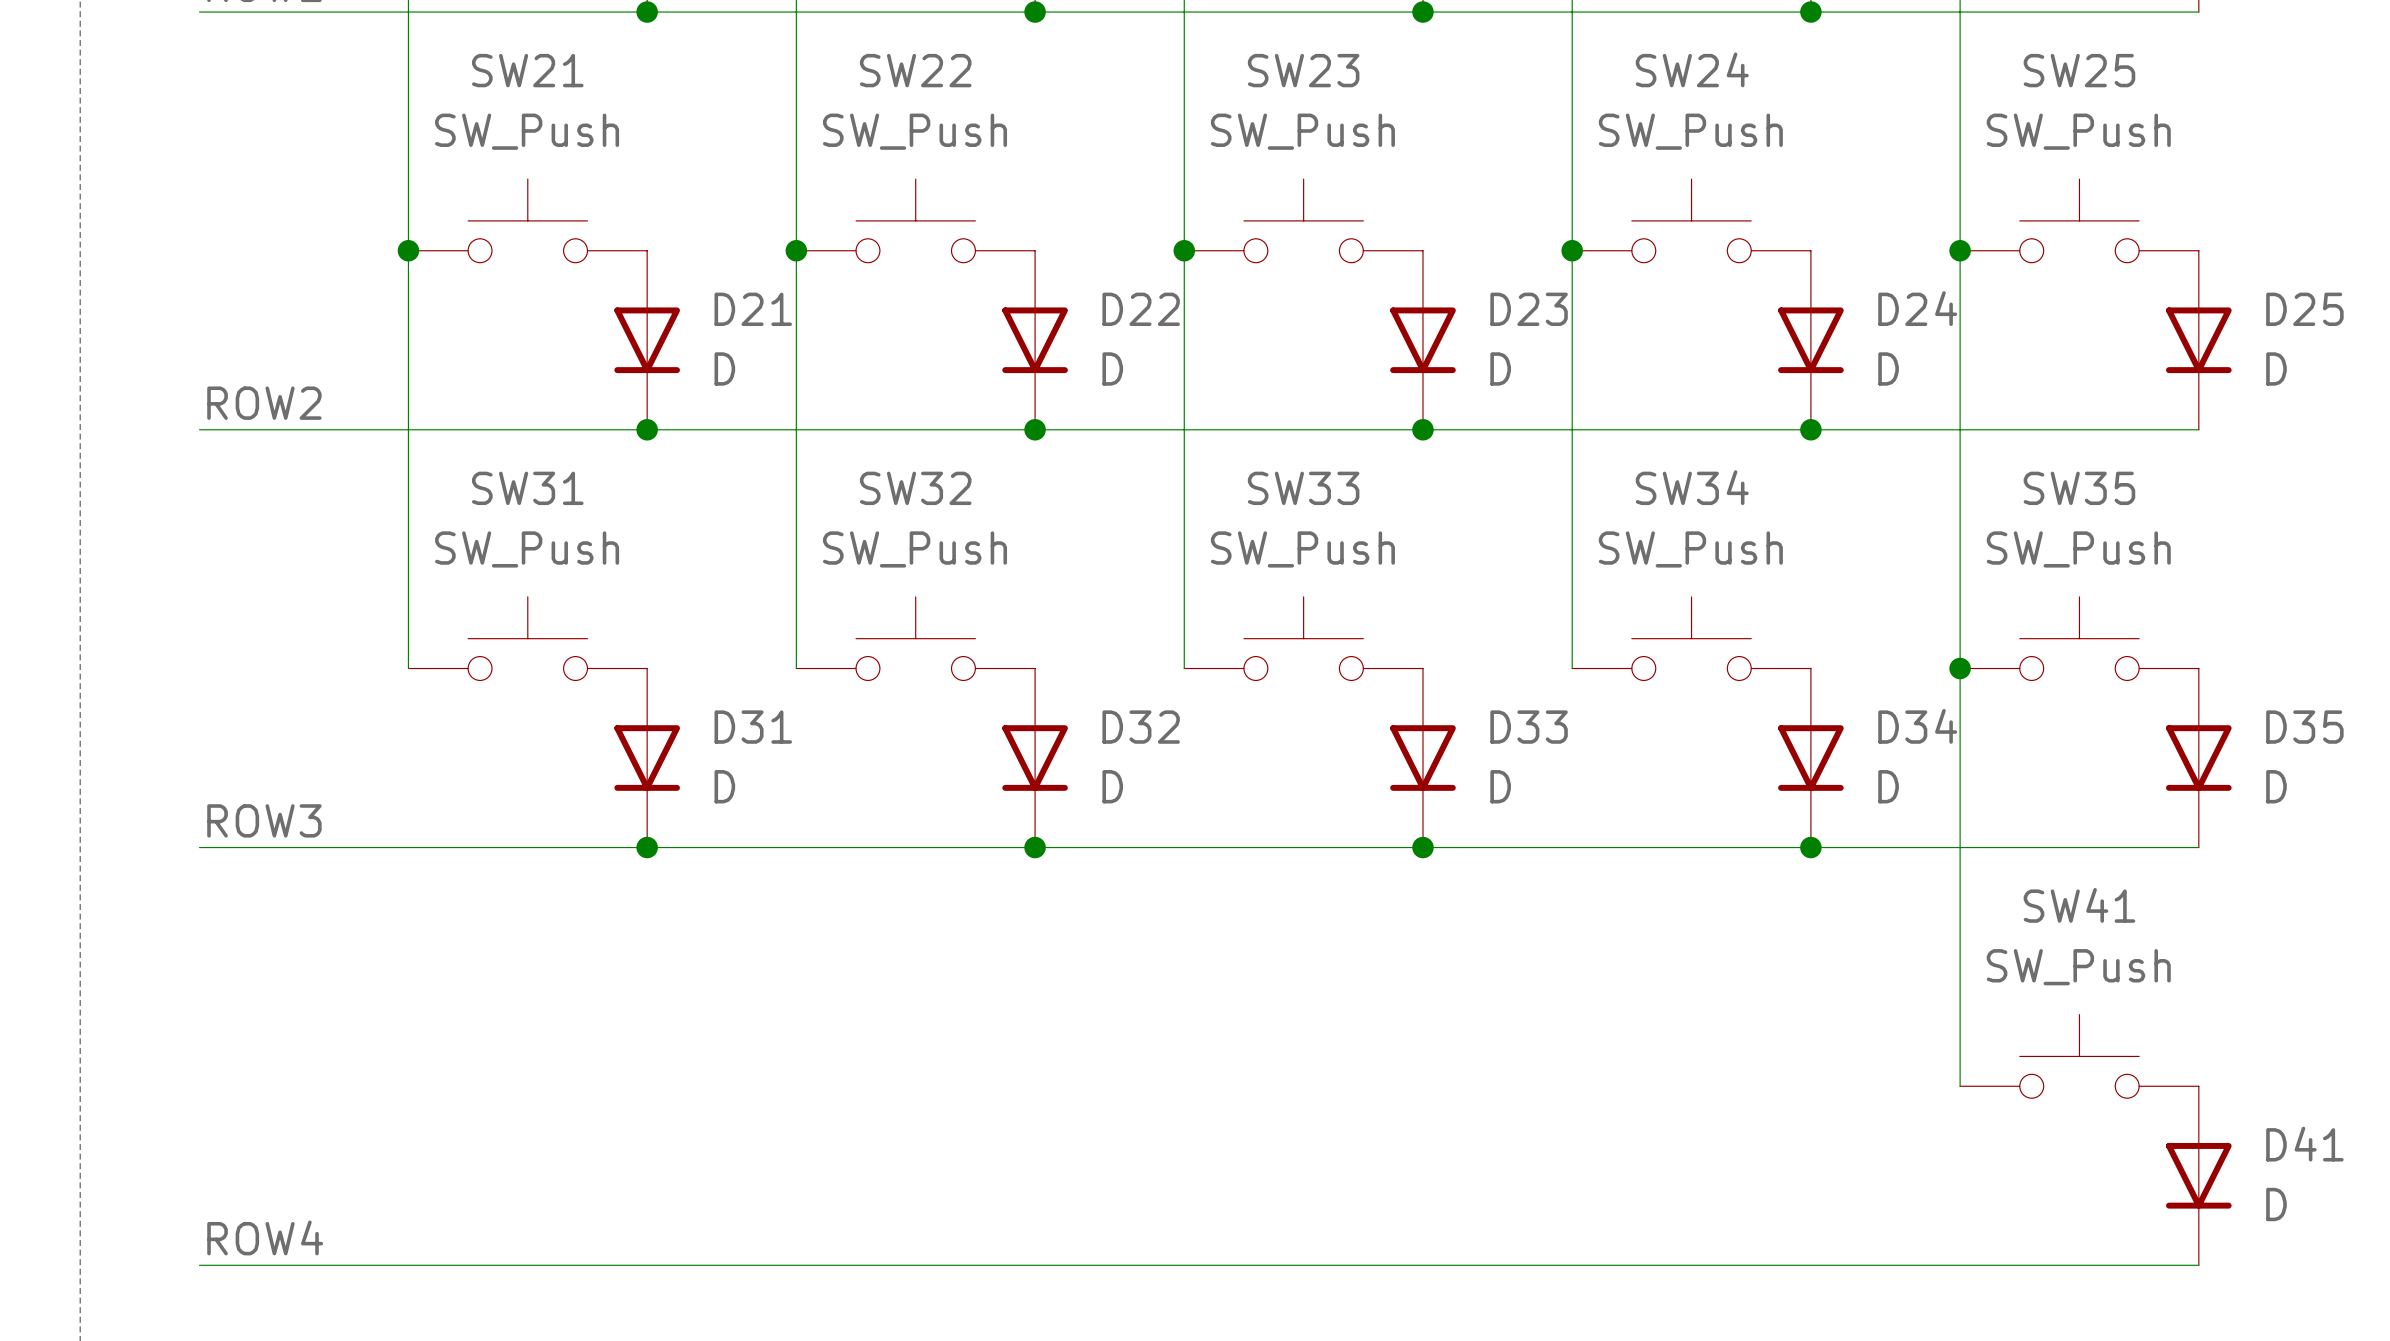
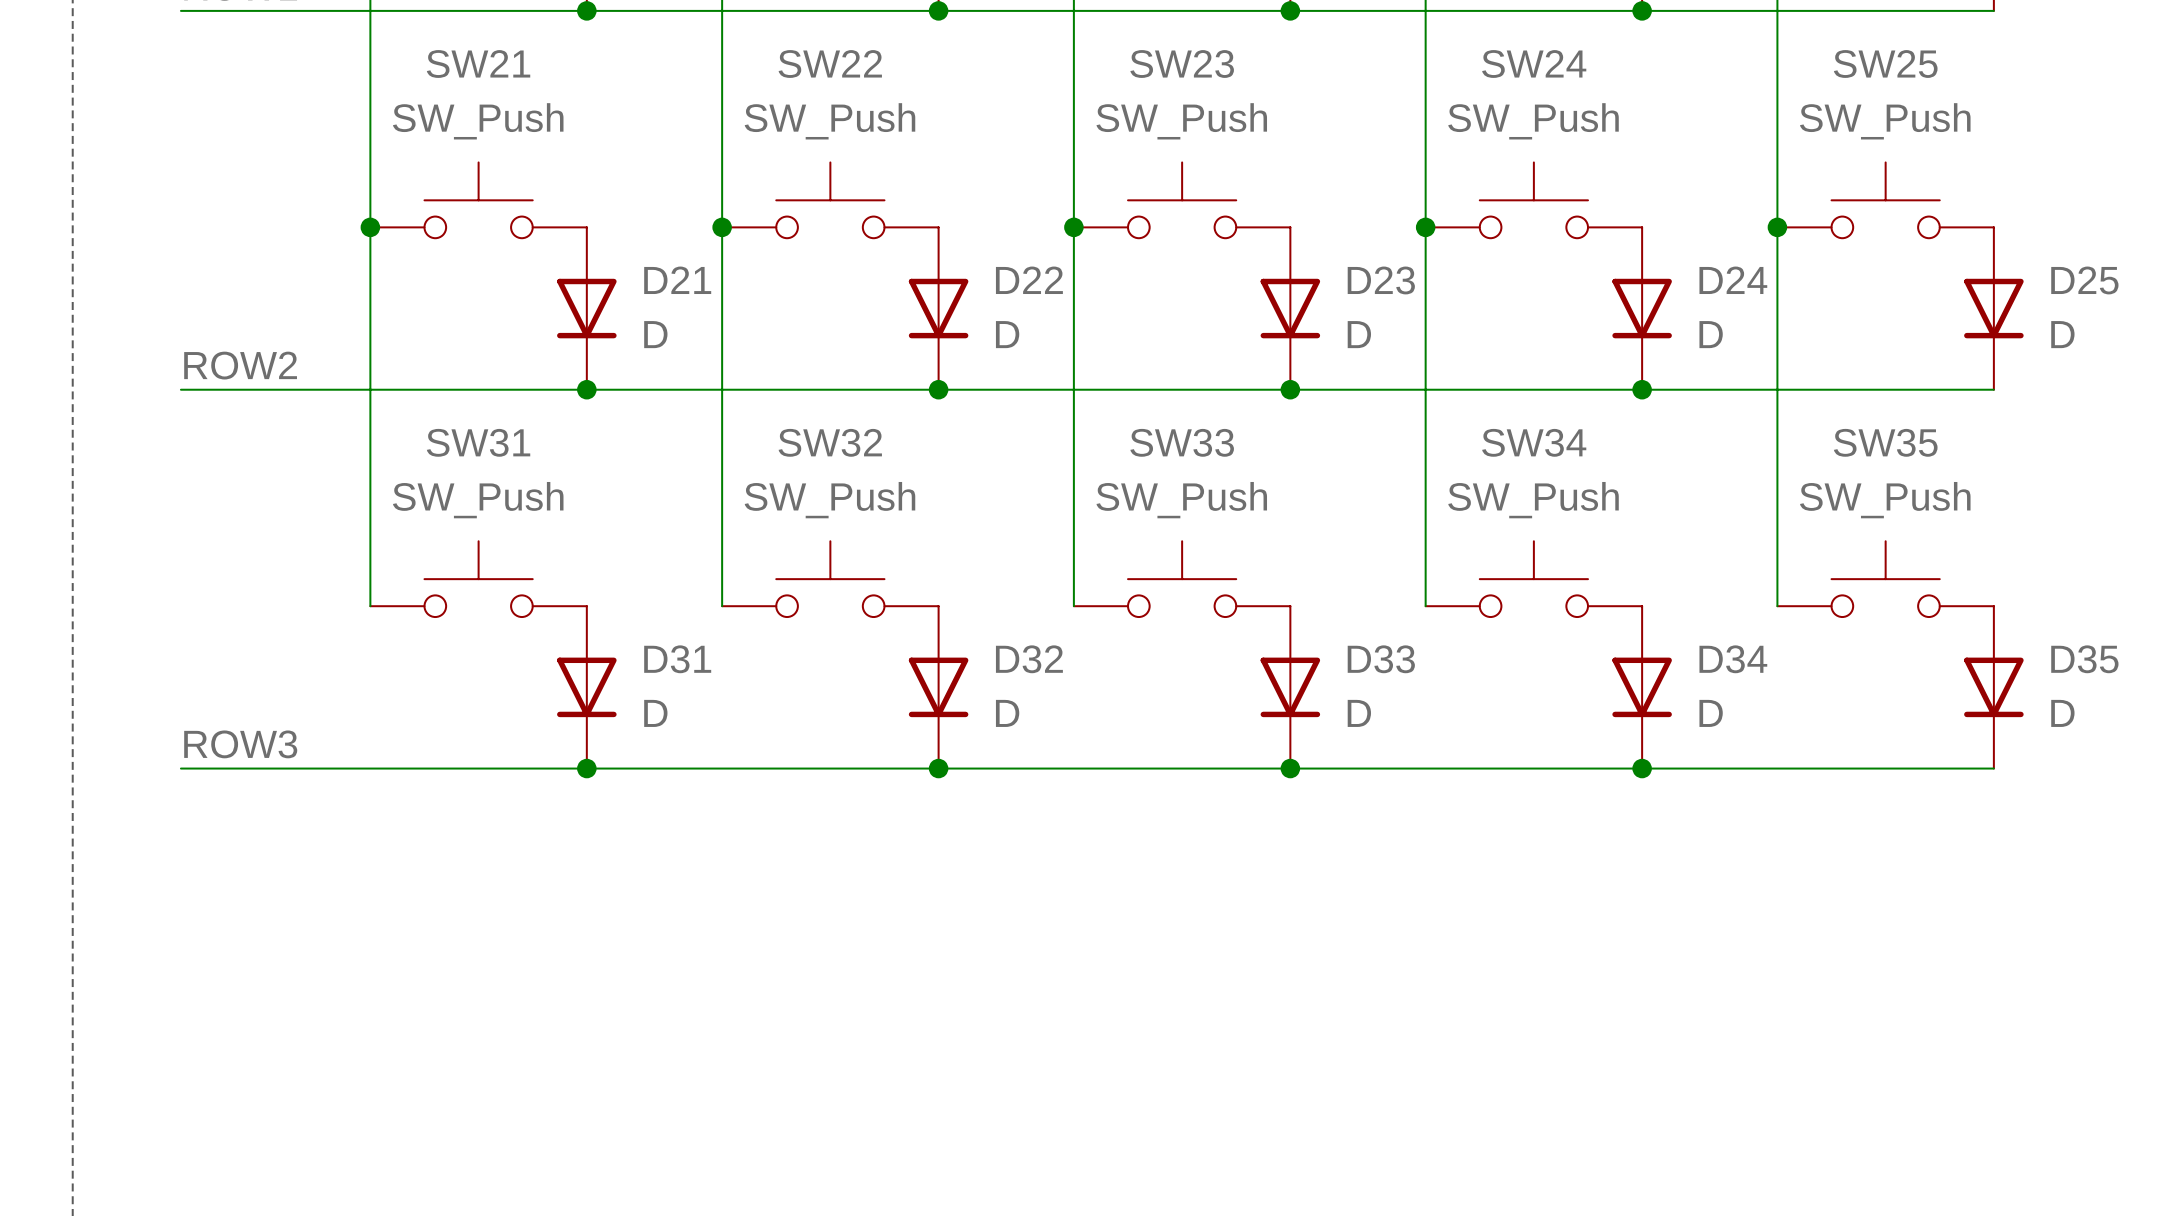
wire: (1960, 668) (1960, 1086) -> none
junction: (1960, 668) -> none
SW41: SW_Push (2079, 1056) -> none
D41: D (2198, 1175) -> none
label: ROW4 (265, 1237) -> none
wire: (199, 1265) (2198, 1265) -> none

